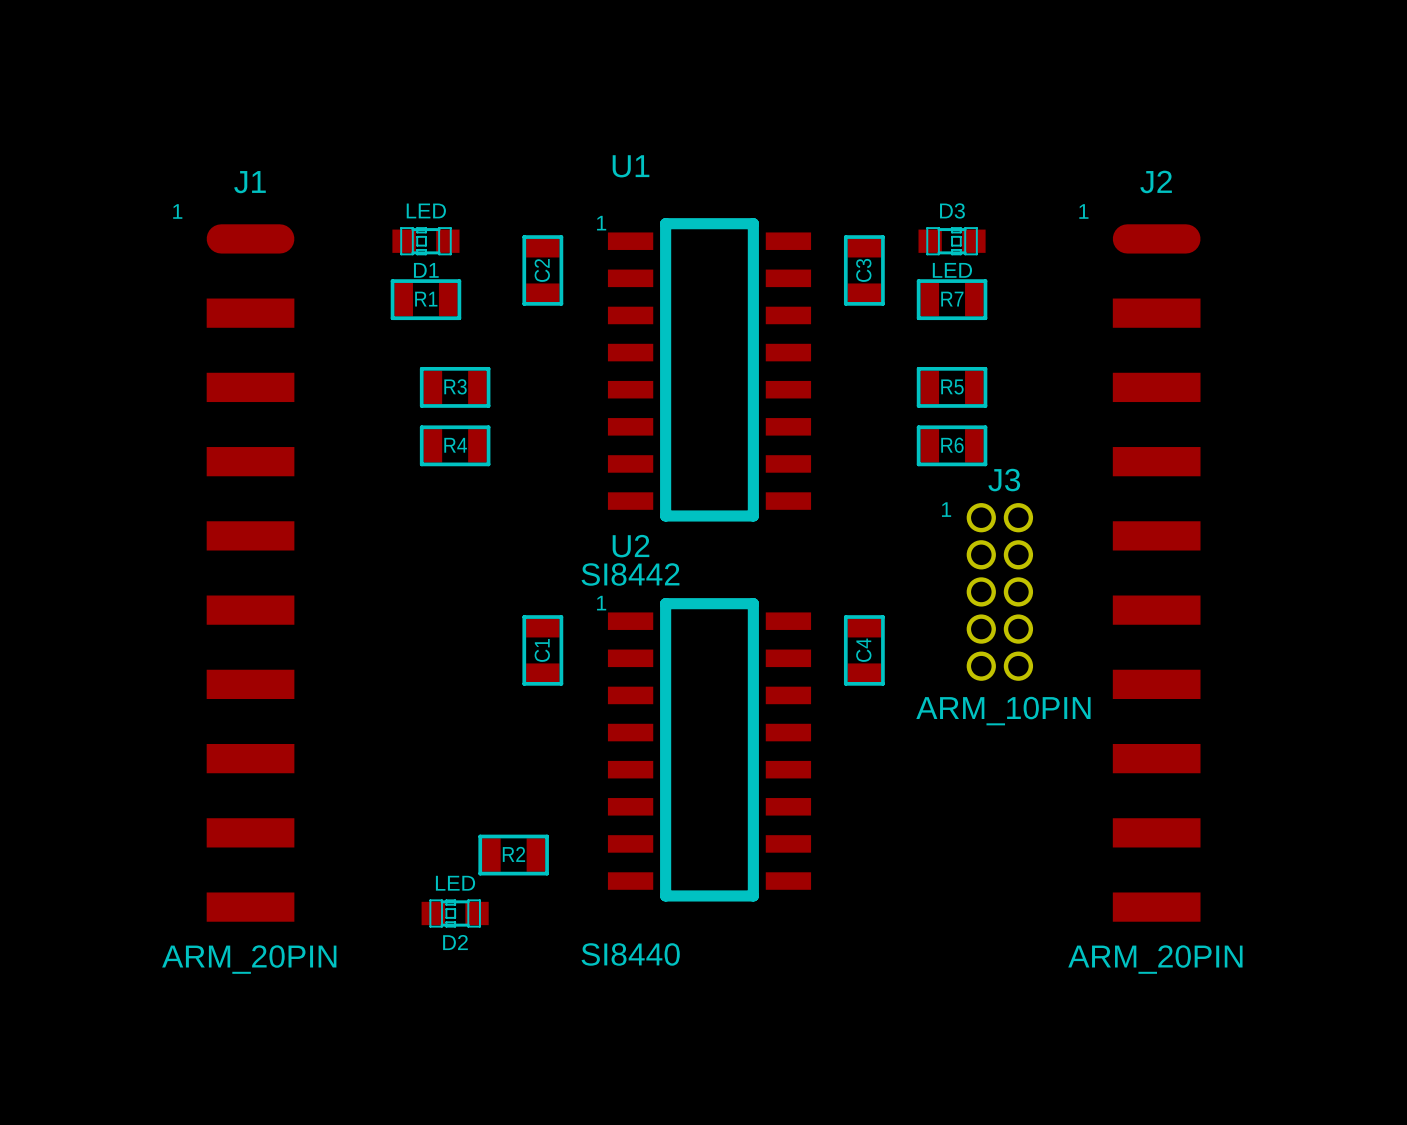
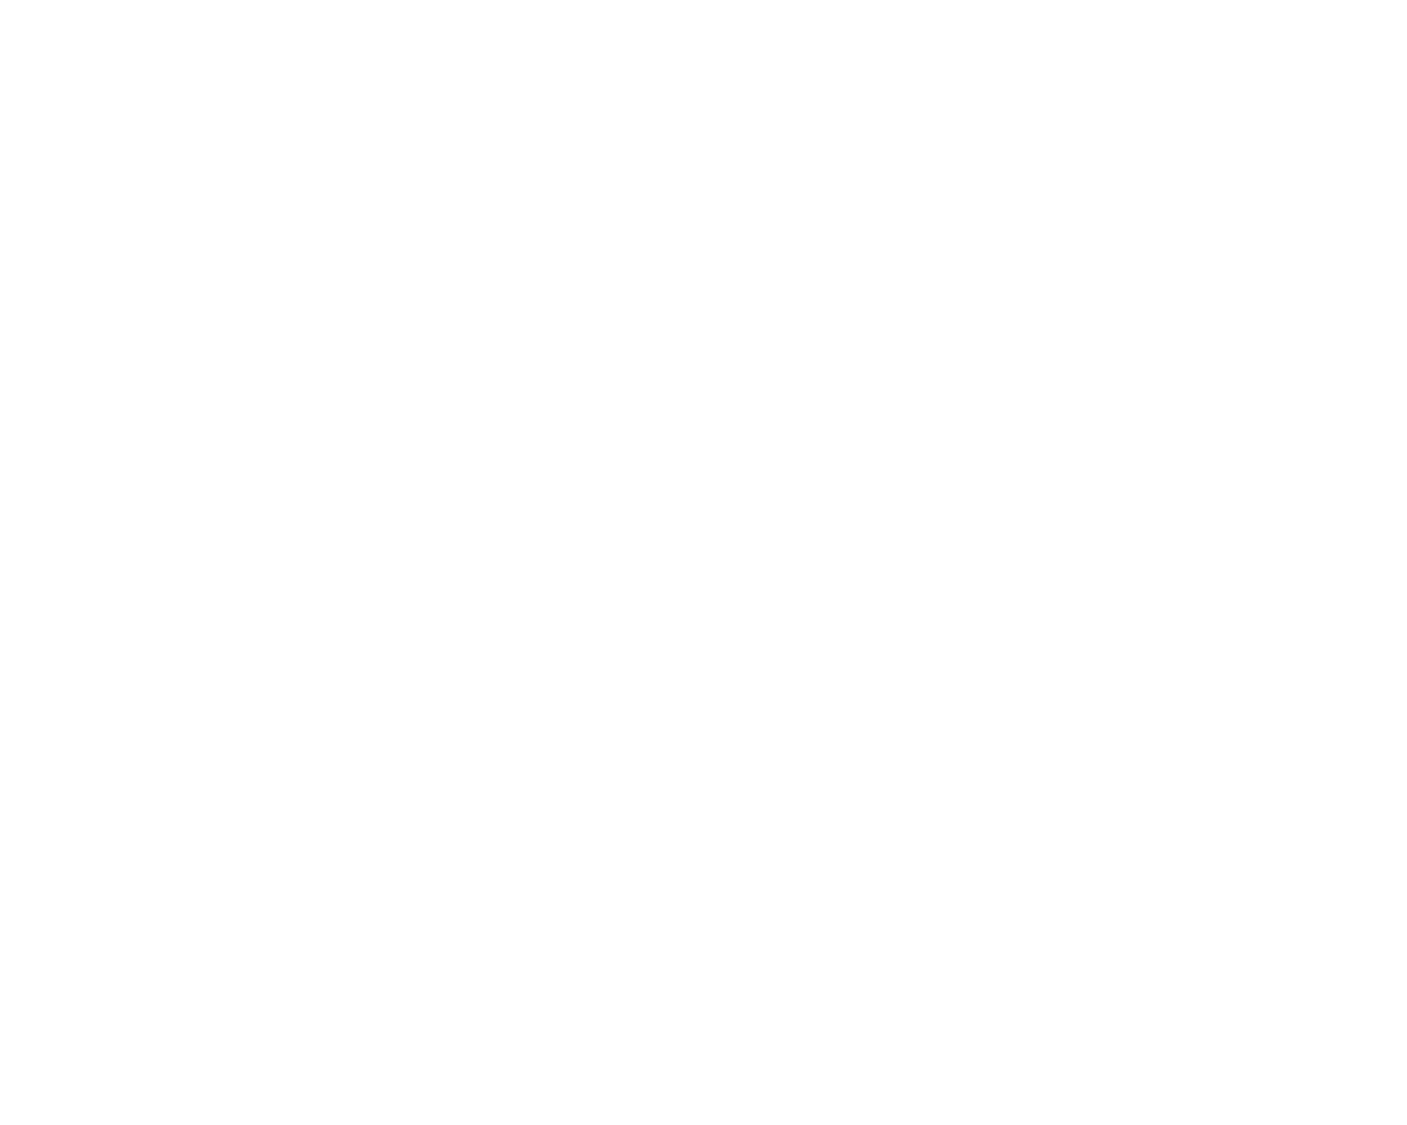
D1: LED (425, 241) -> none
D3: LED (952, 241) -> none
C2: (542, 270) -> none
C3: (864, 270) -> none
R1: (425, 299) -> none
R7: (952, 299) -> none
U1: SI8442 (709, 369) -> none
R3: (455, 387) -> none
R5: (952, 387) -> none
R4: (455, 445) -> none
R6: (952, 445) -> none
J1: ARM_20PIN (250, 573) -> none
J2: ARM_20PIN (1156, 573) -> none
J3: ARM_10PIN (999, 591) -> none
C1: (542, 650) -> none
C4: (864, 650) -> none
U2: SI8440 (709, 749) -> none
R2: (513, 855) -> none
D2: LED (455, 913) -> none

